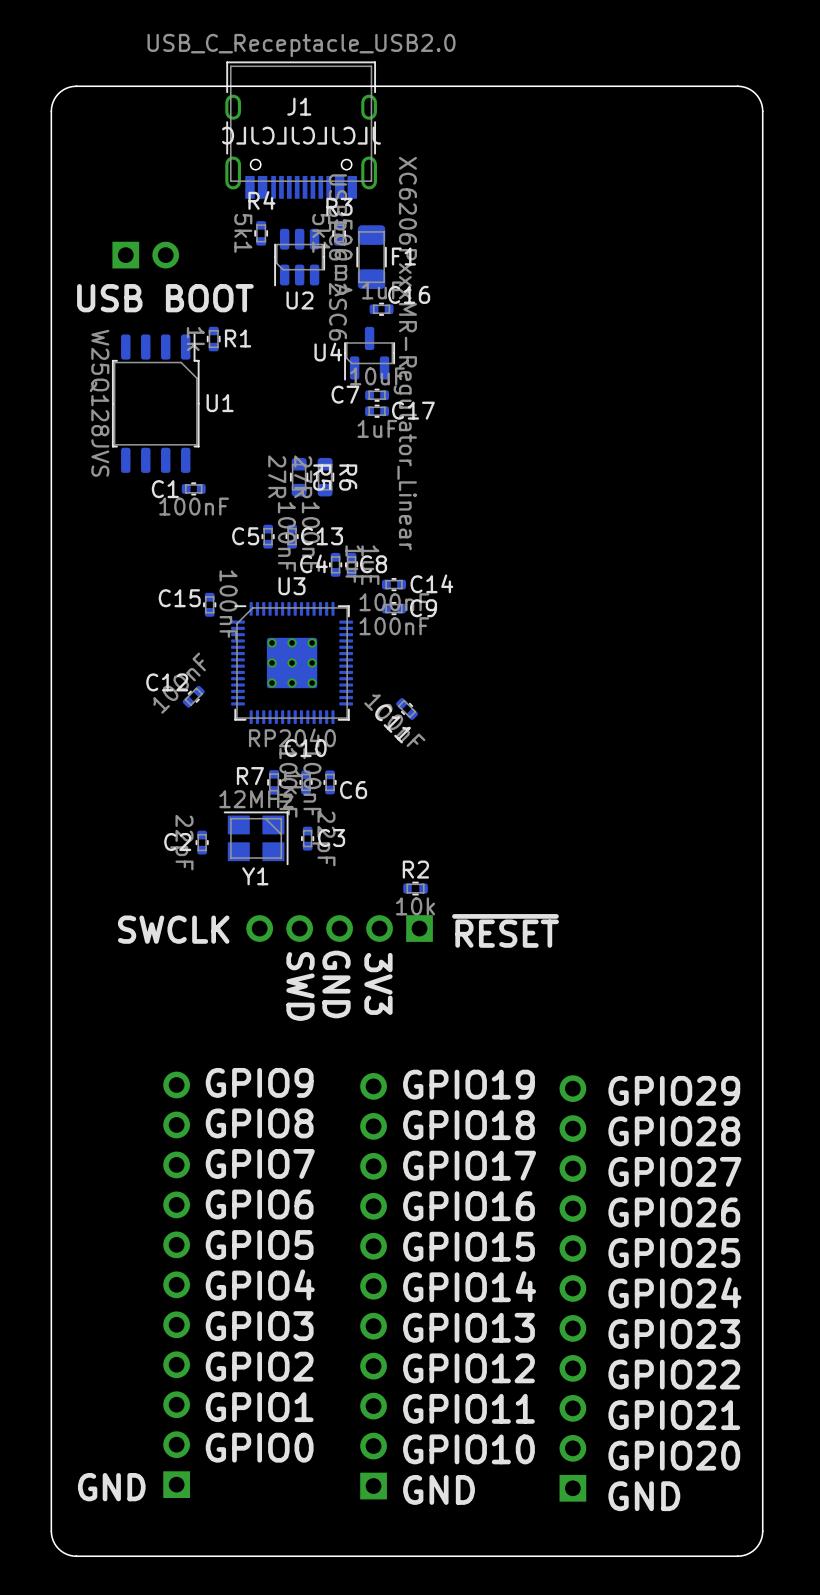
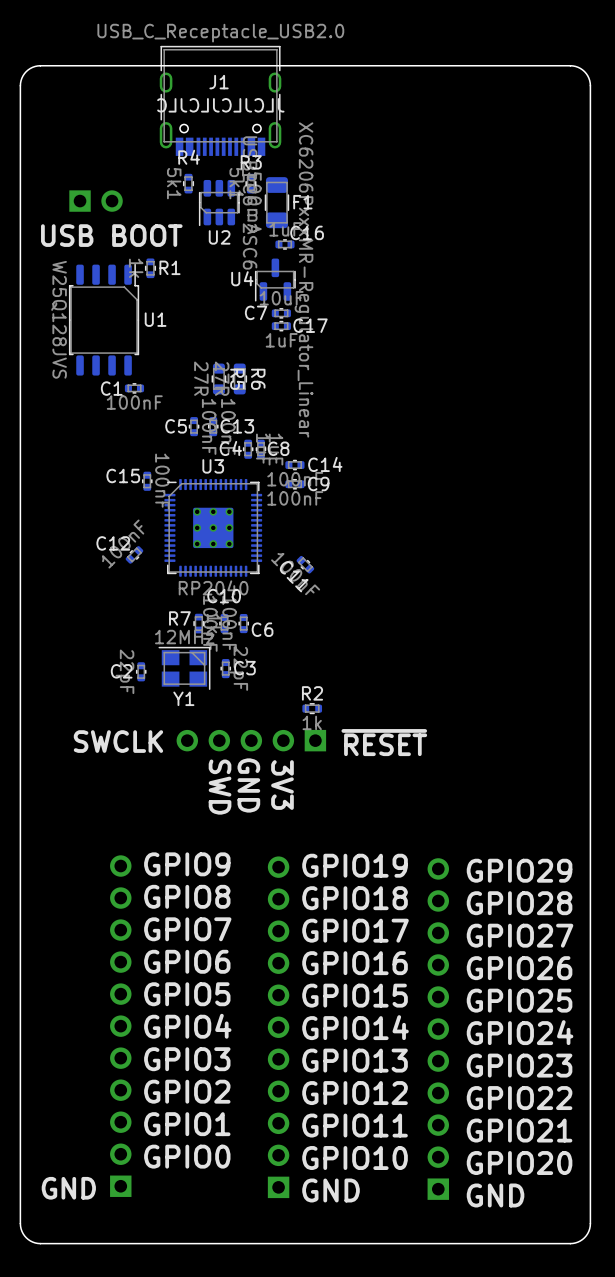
R2 value: 10k (415, 906) -> 1k (312, 722)

